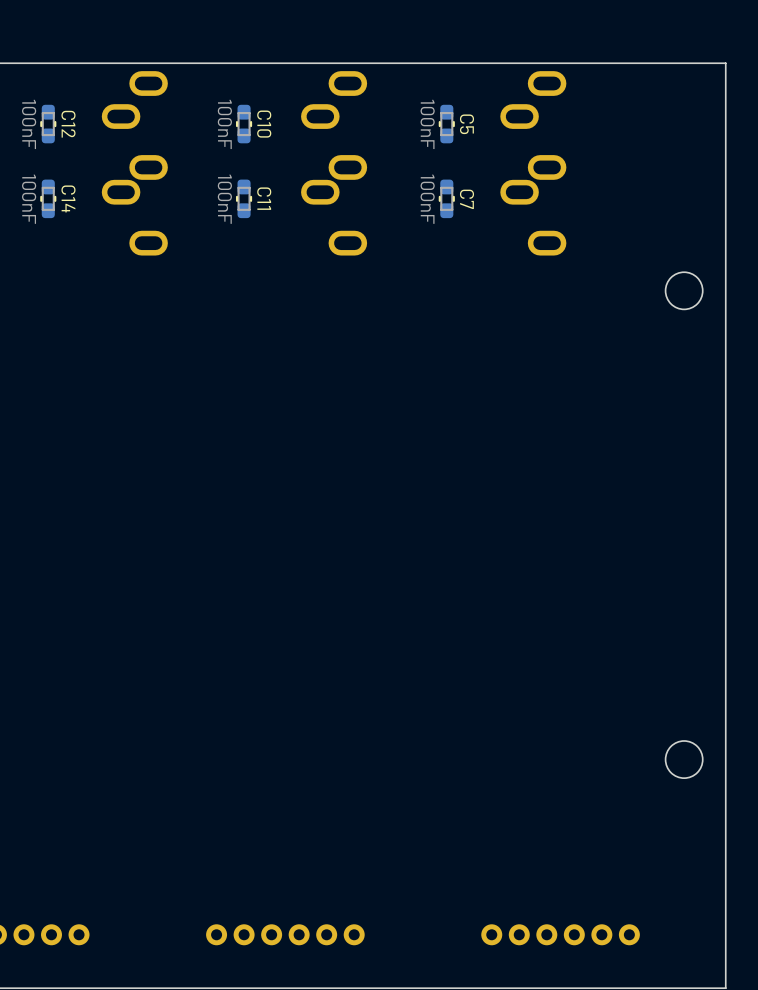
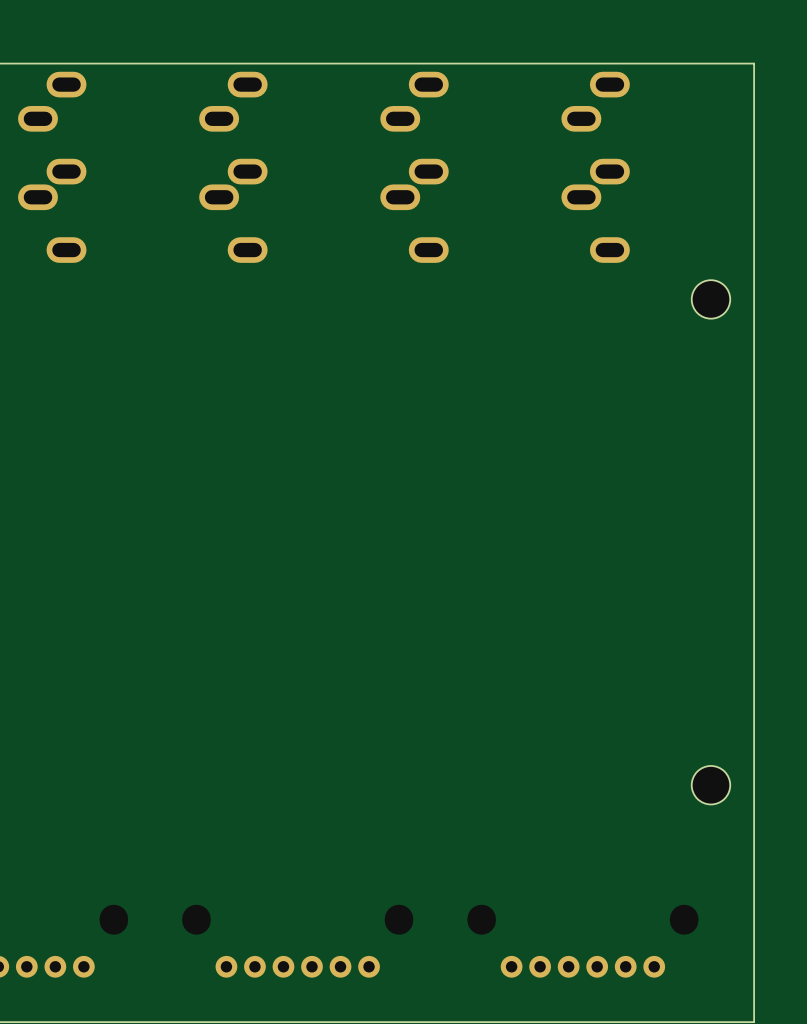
C12: 100nF (48, 124) -> none
C10: 100nF (244, 124) -> none
C5: 100nF (446, 124) -> none
part: none -> (52, 167)
part: (134, 163) -> none
part: none -> (233, 167)
part: (334, 163) -> none
part: none -> (414, 167)
part position: (533, 163) -> (595, 167)
C14: 100nF (48, 198) -> none
C11: 100nF (244, 198) -> none
C7: 100nF (446, 198) -> none

